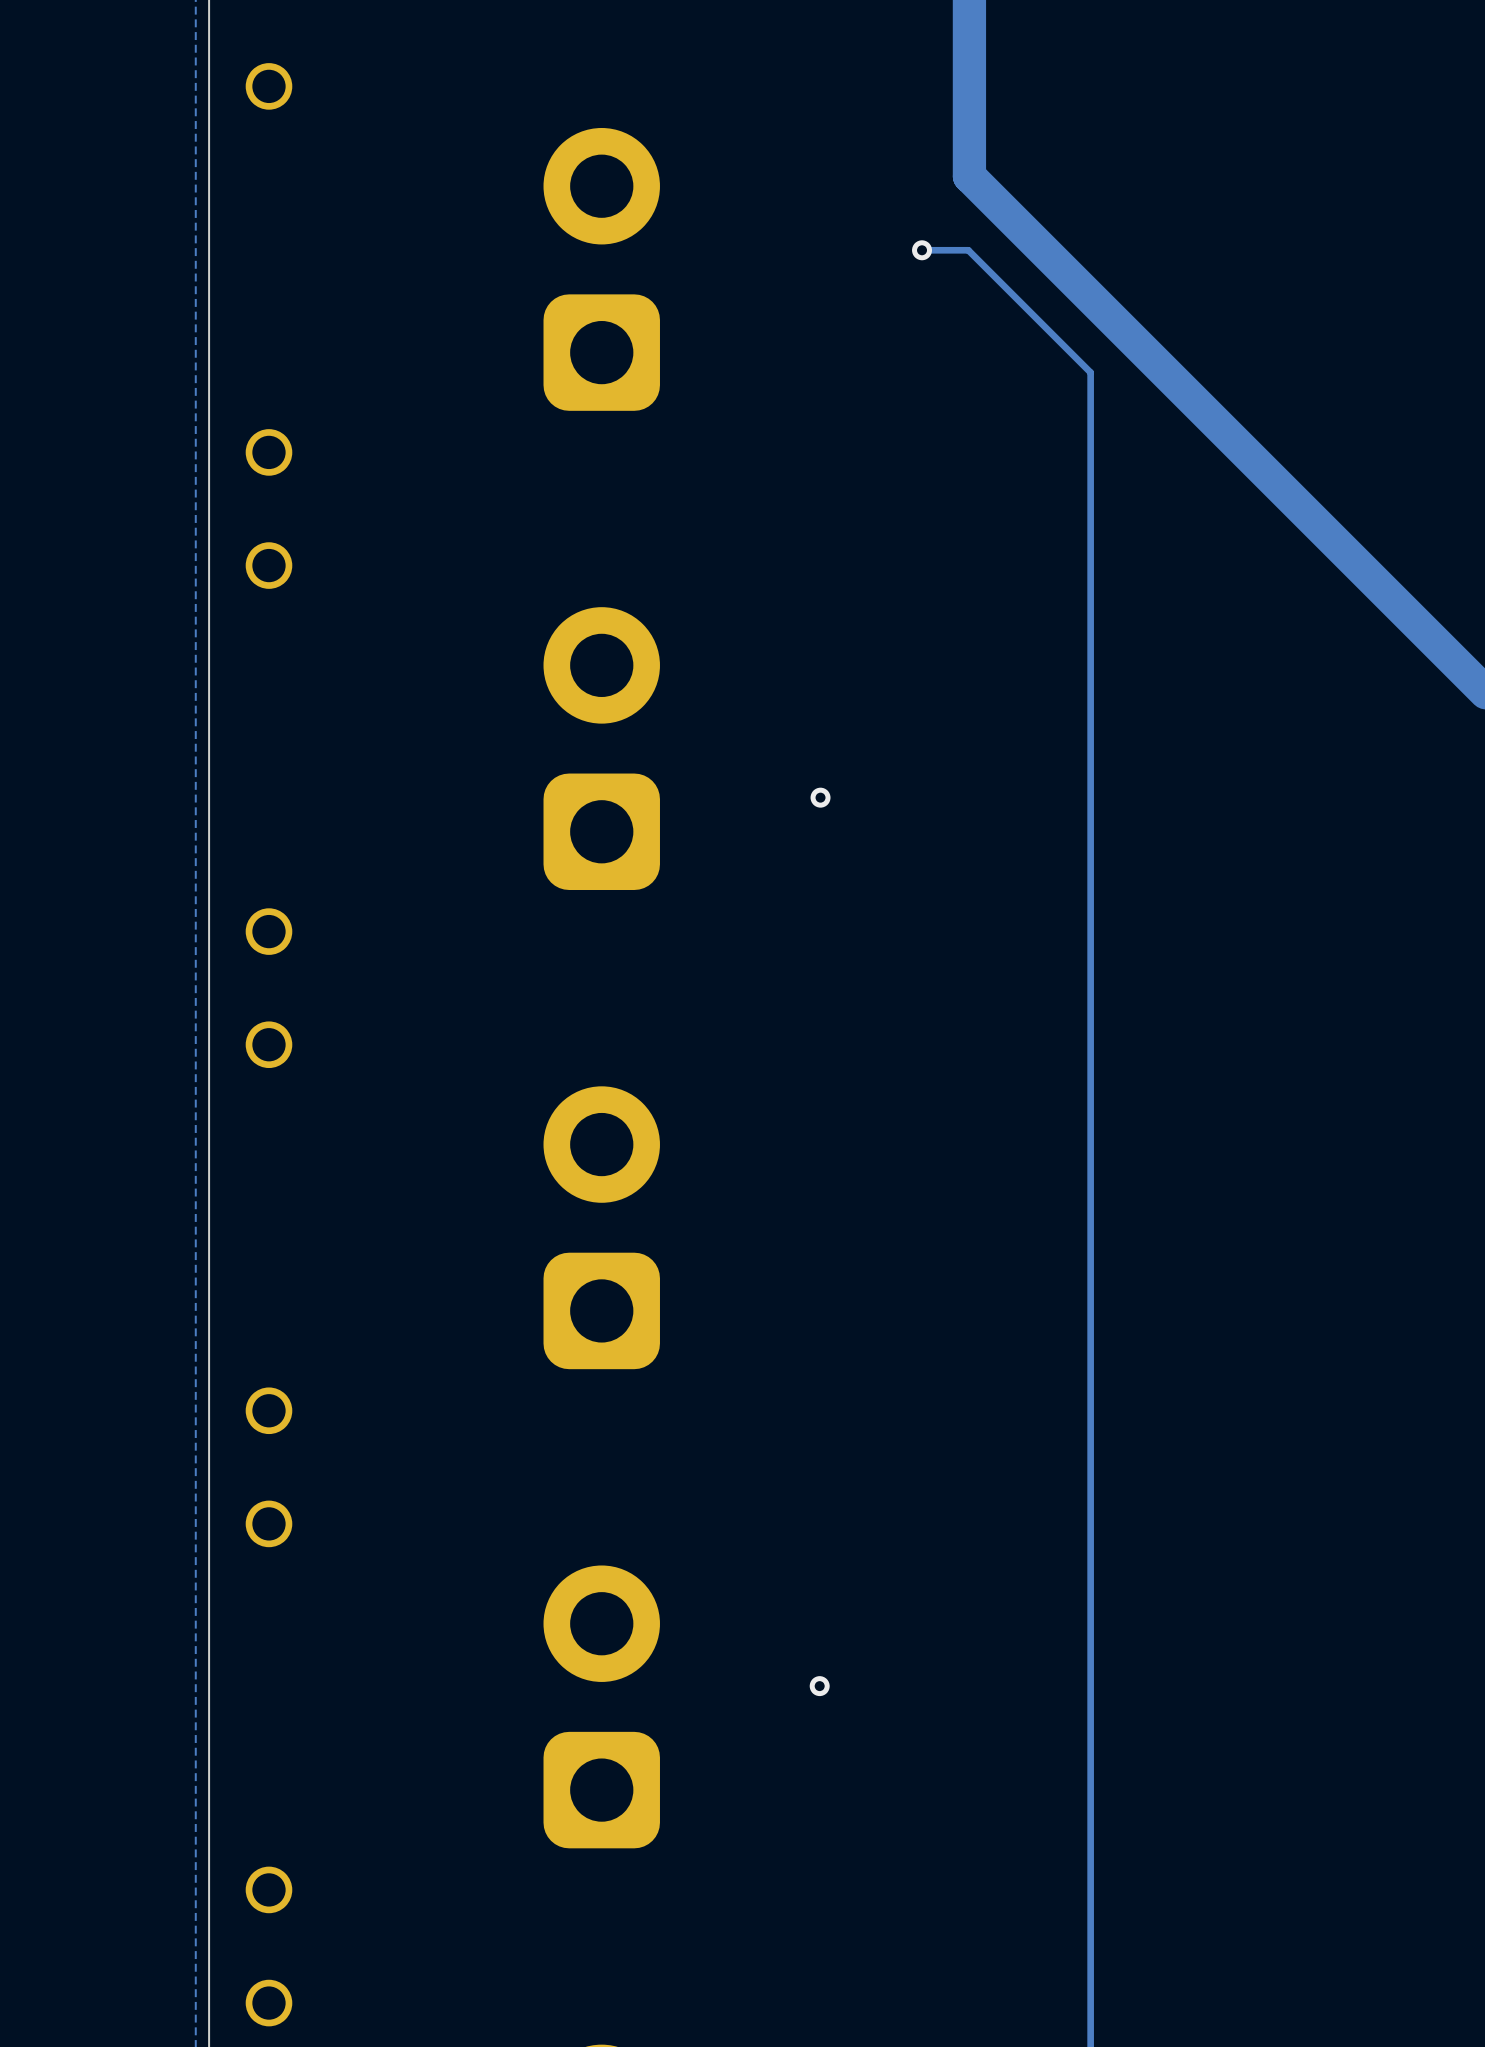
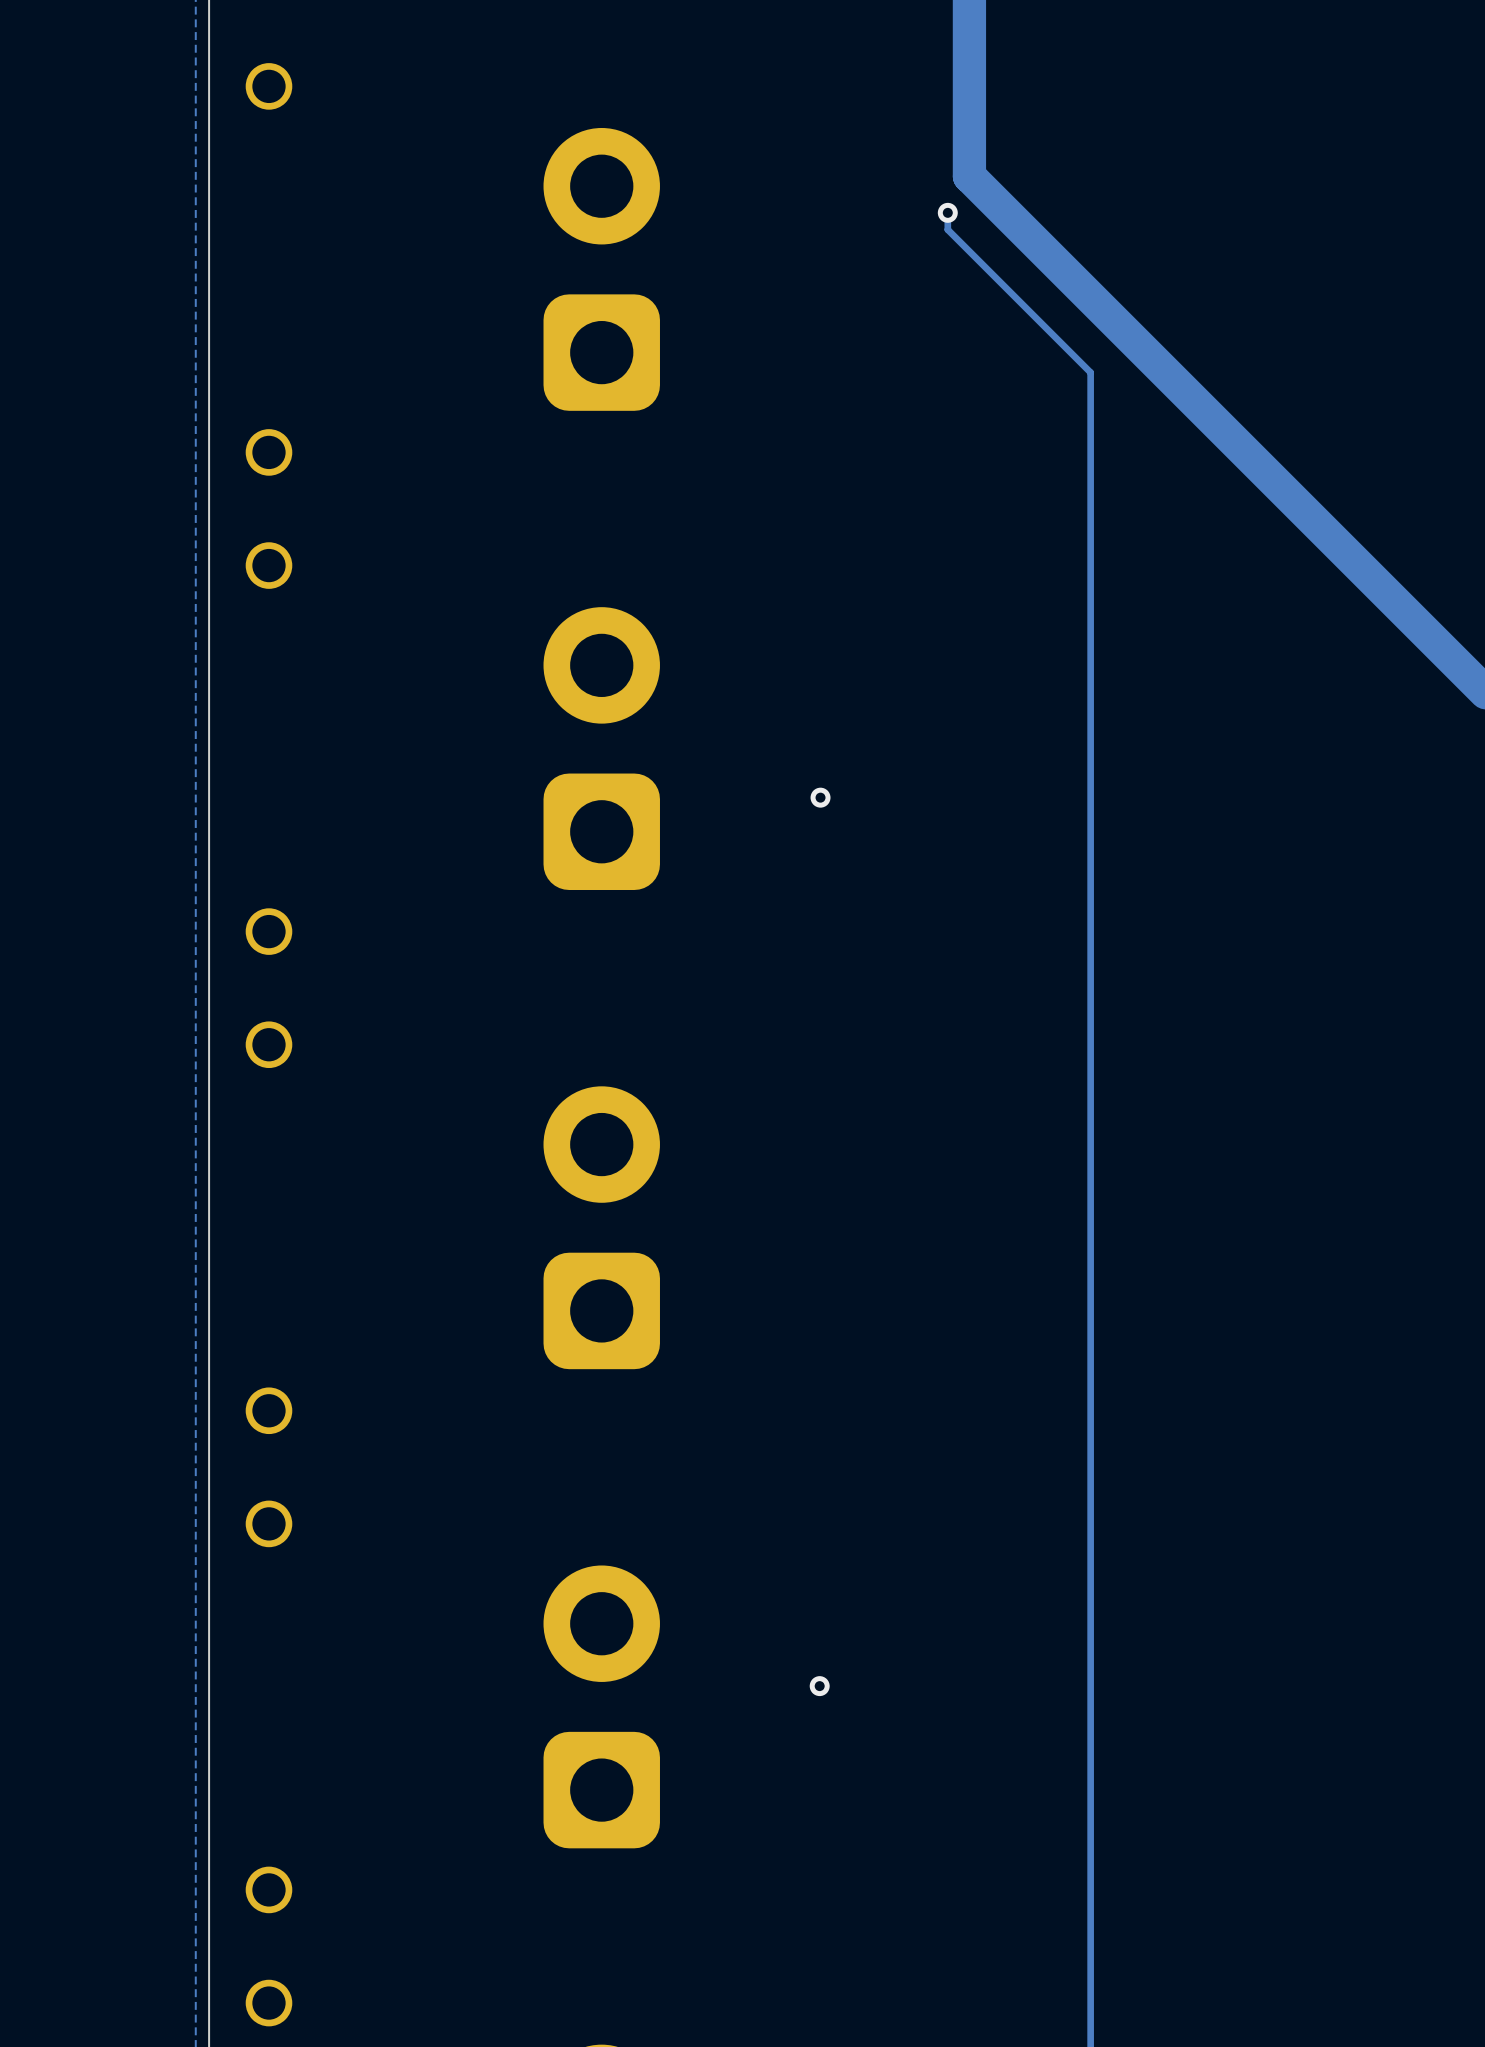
via position: (922, 250) -> (947, 212)
track: (968, 250) (922, 250) -> (968, 250) (947, 229) (947, 212)

